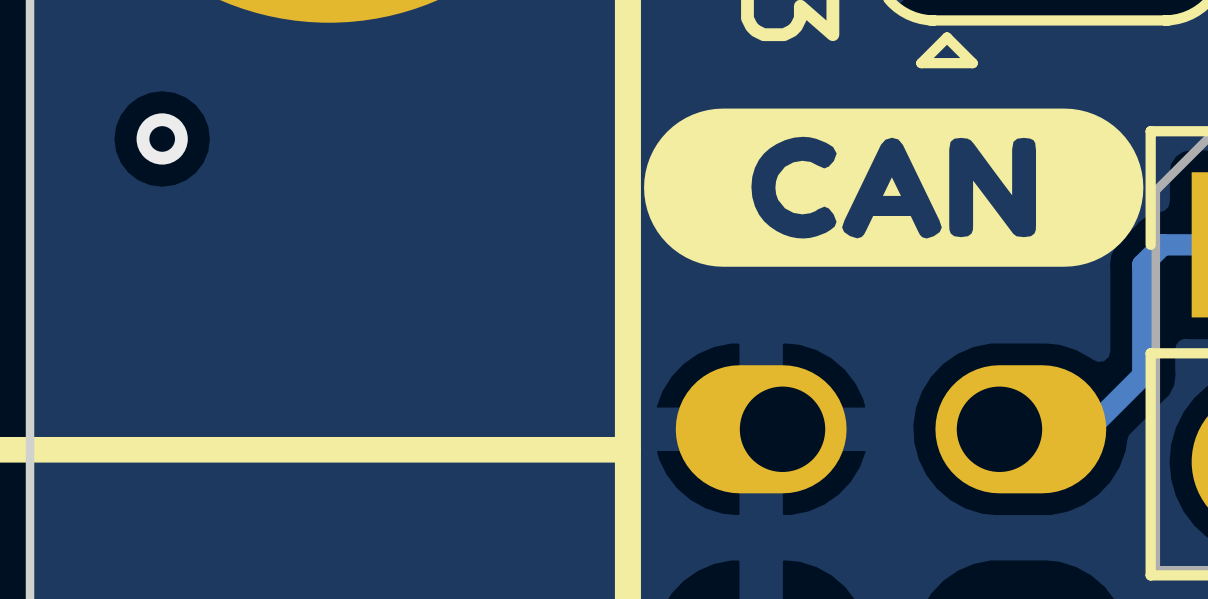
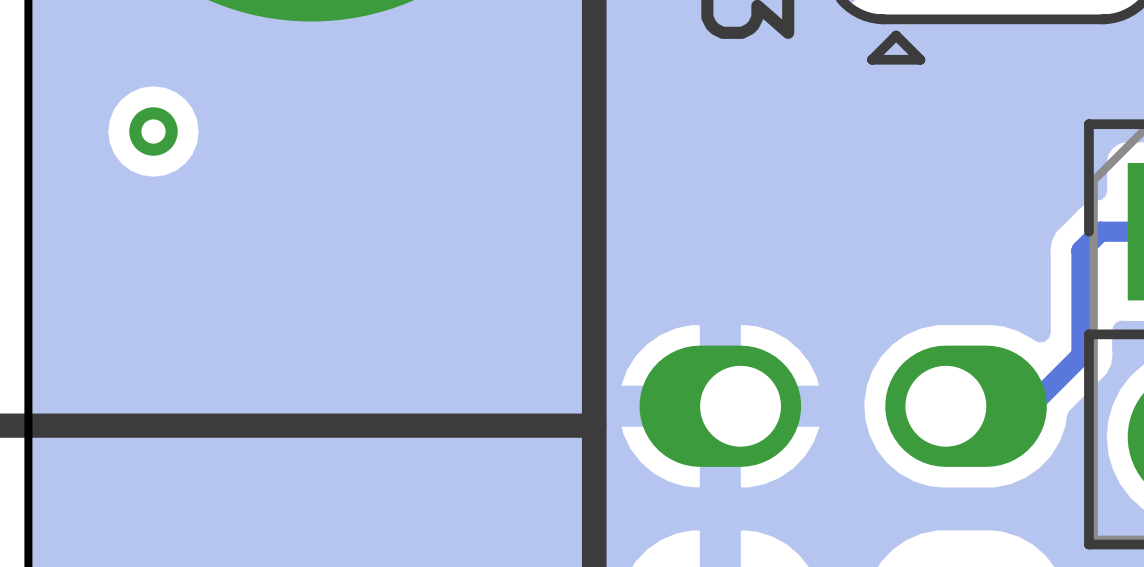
drawing: [644, 108, 1144, 267] -> none

